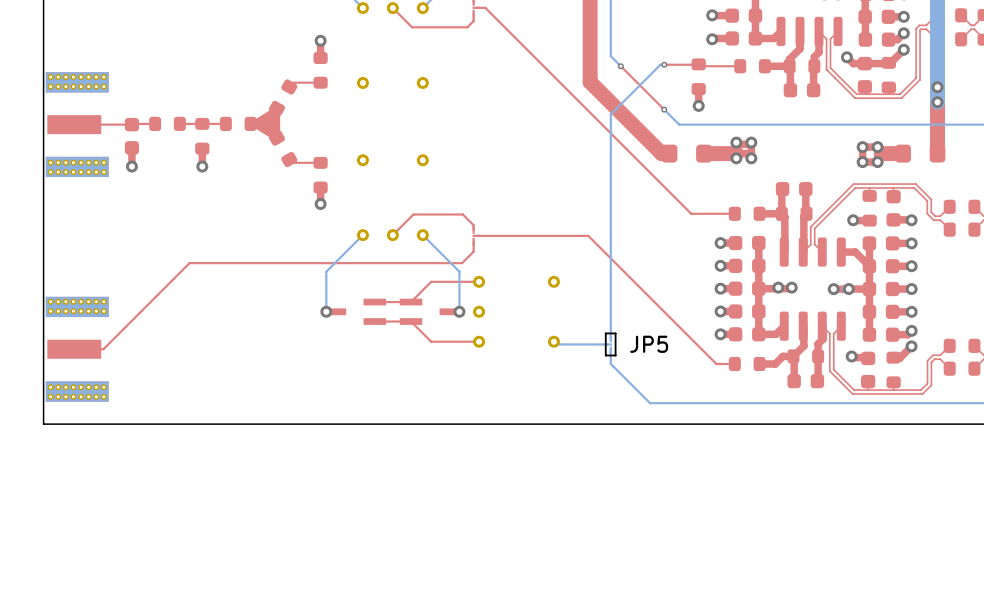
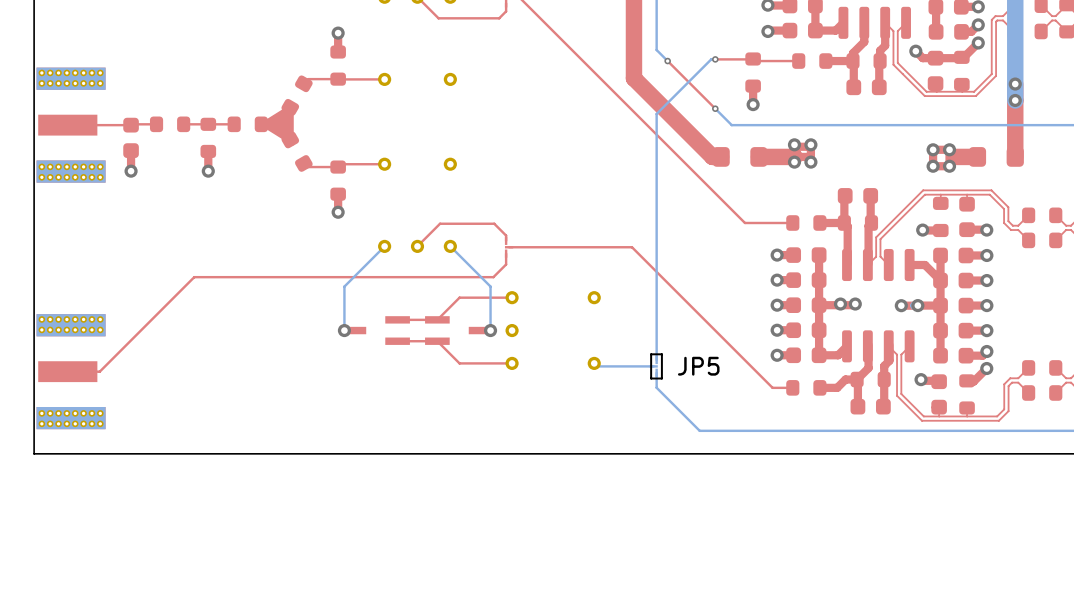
top track: none -> (338, 79) (384, 79)
top track: none -> (384, 164) (340, 164) (338, 167)

